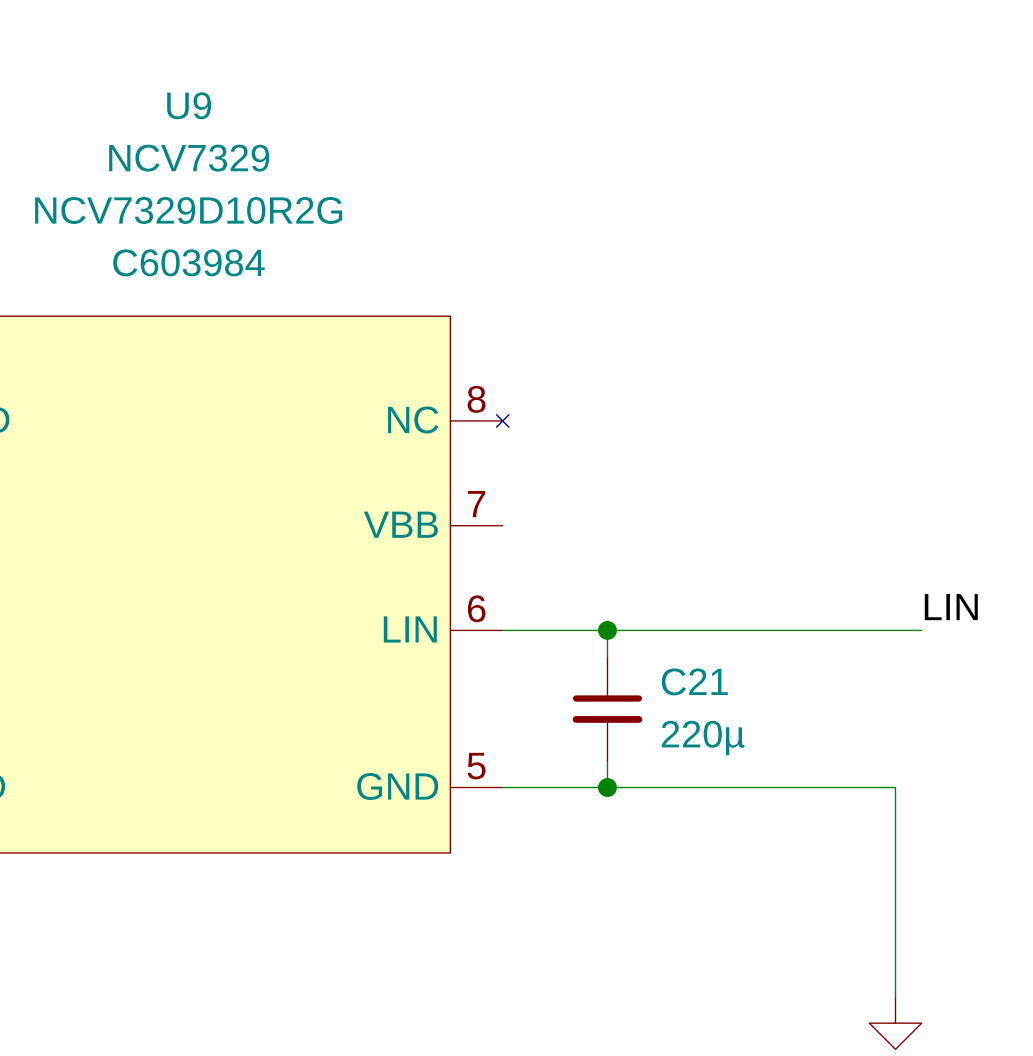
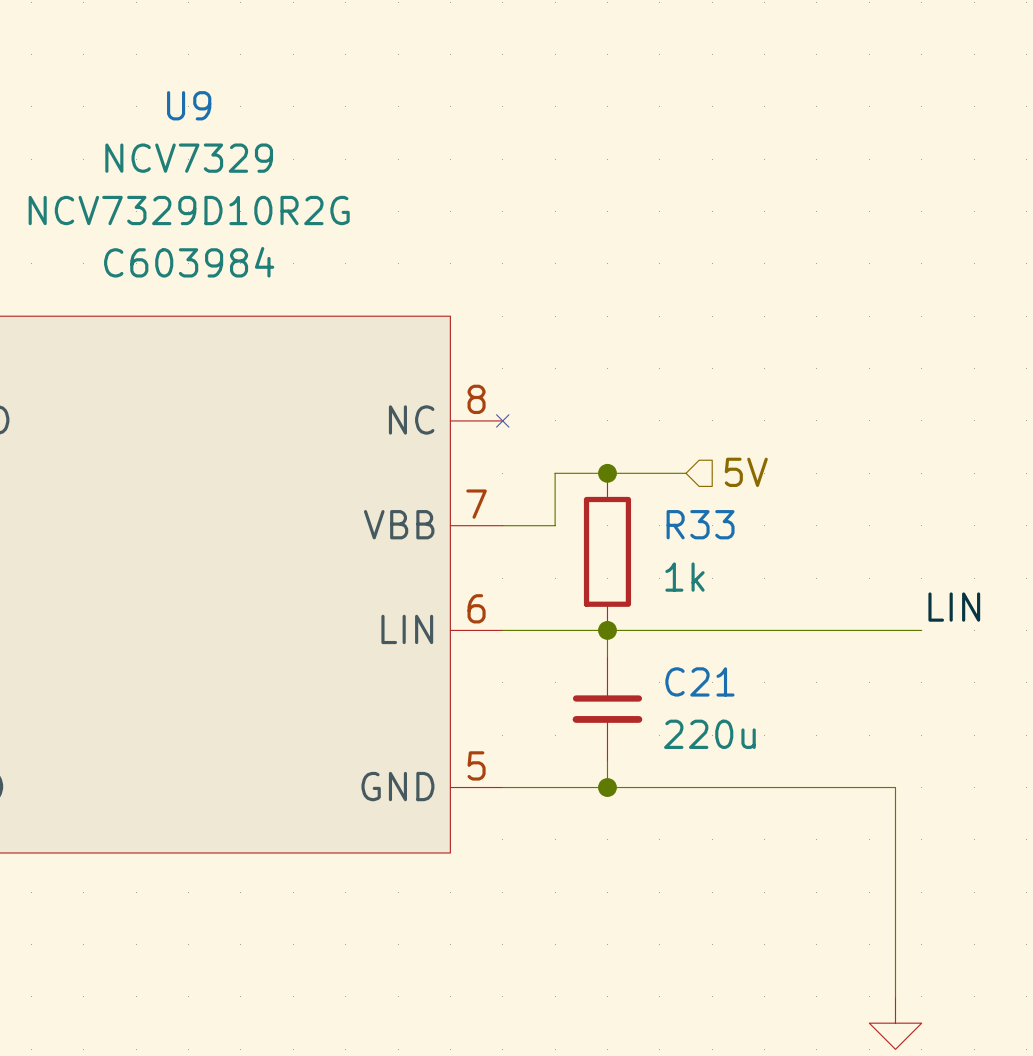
hierarchical label: none -> 5V (746, 472)
junction: none -> (607, 473)
wire: none -> (686, 473) (555, 473) (555, 525) (502, 525)
R33: none -> 1k (607, 551)
C21 value: 220µ (703, 738) -> 220u (709, 734)

